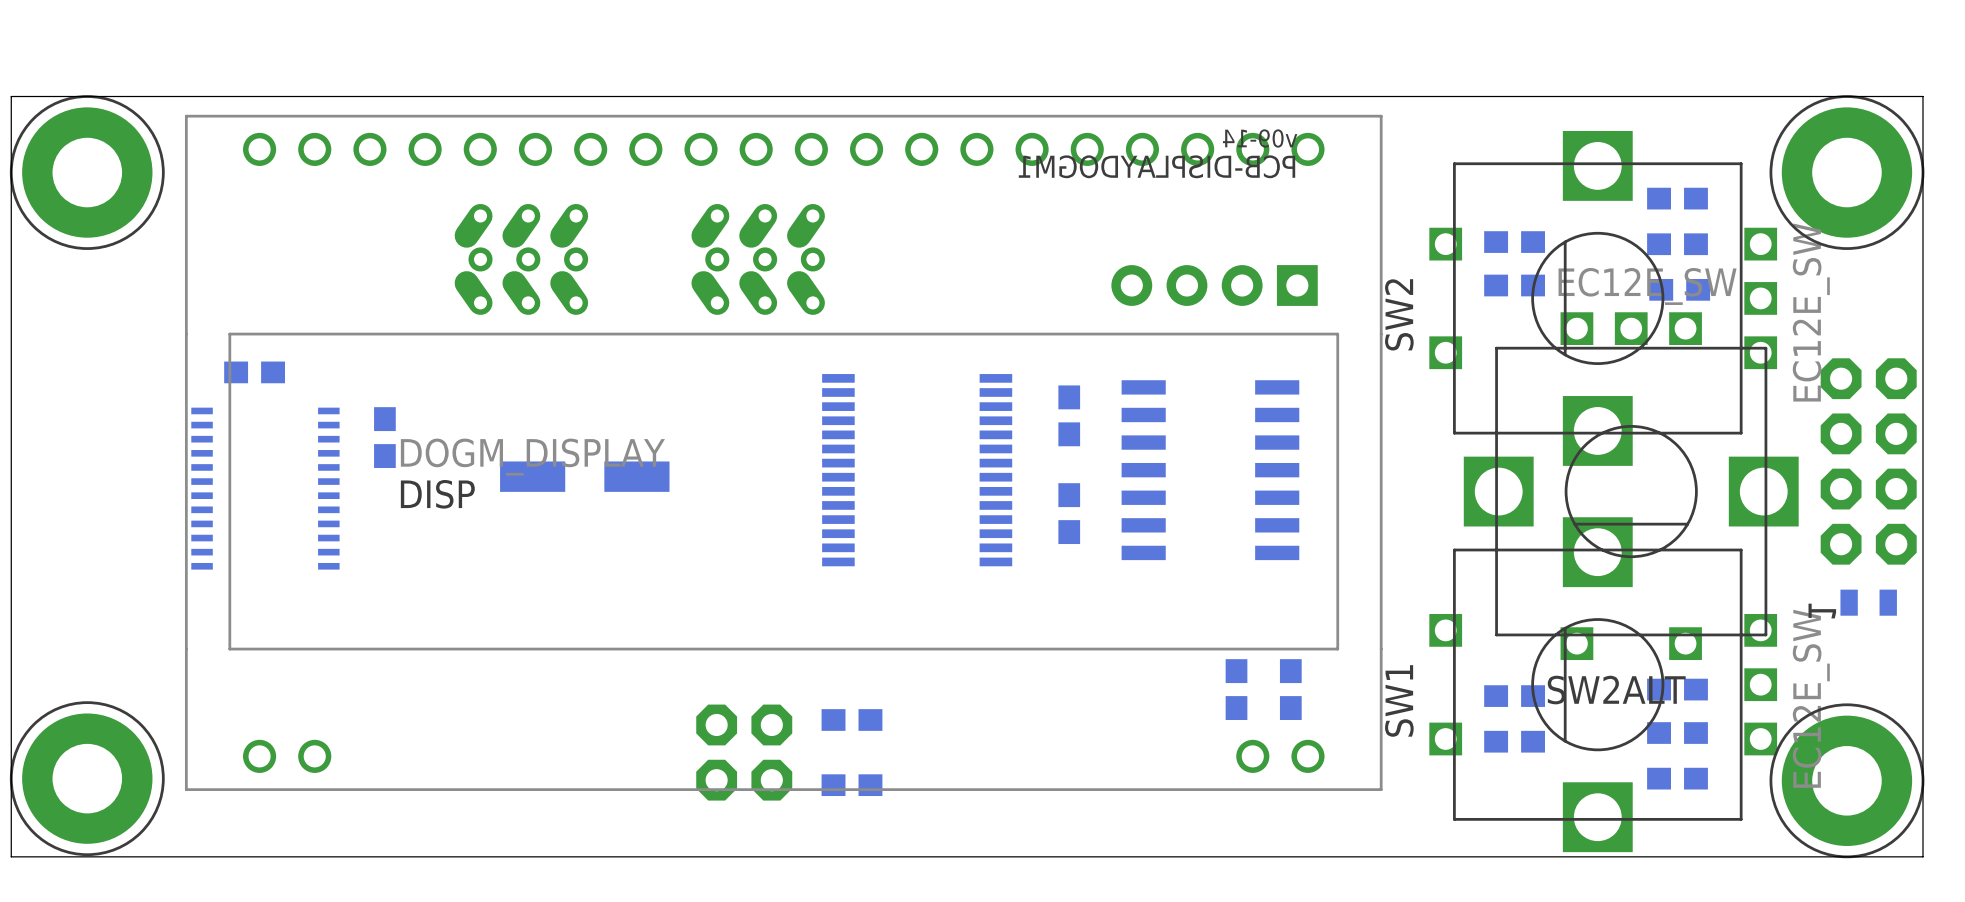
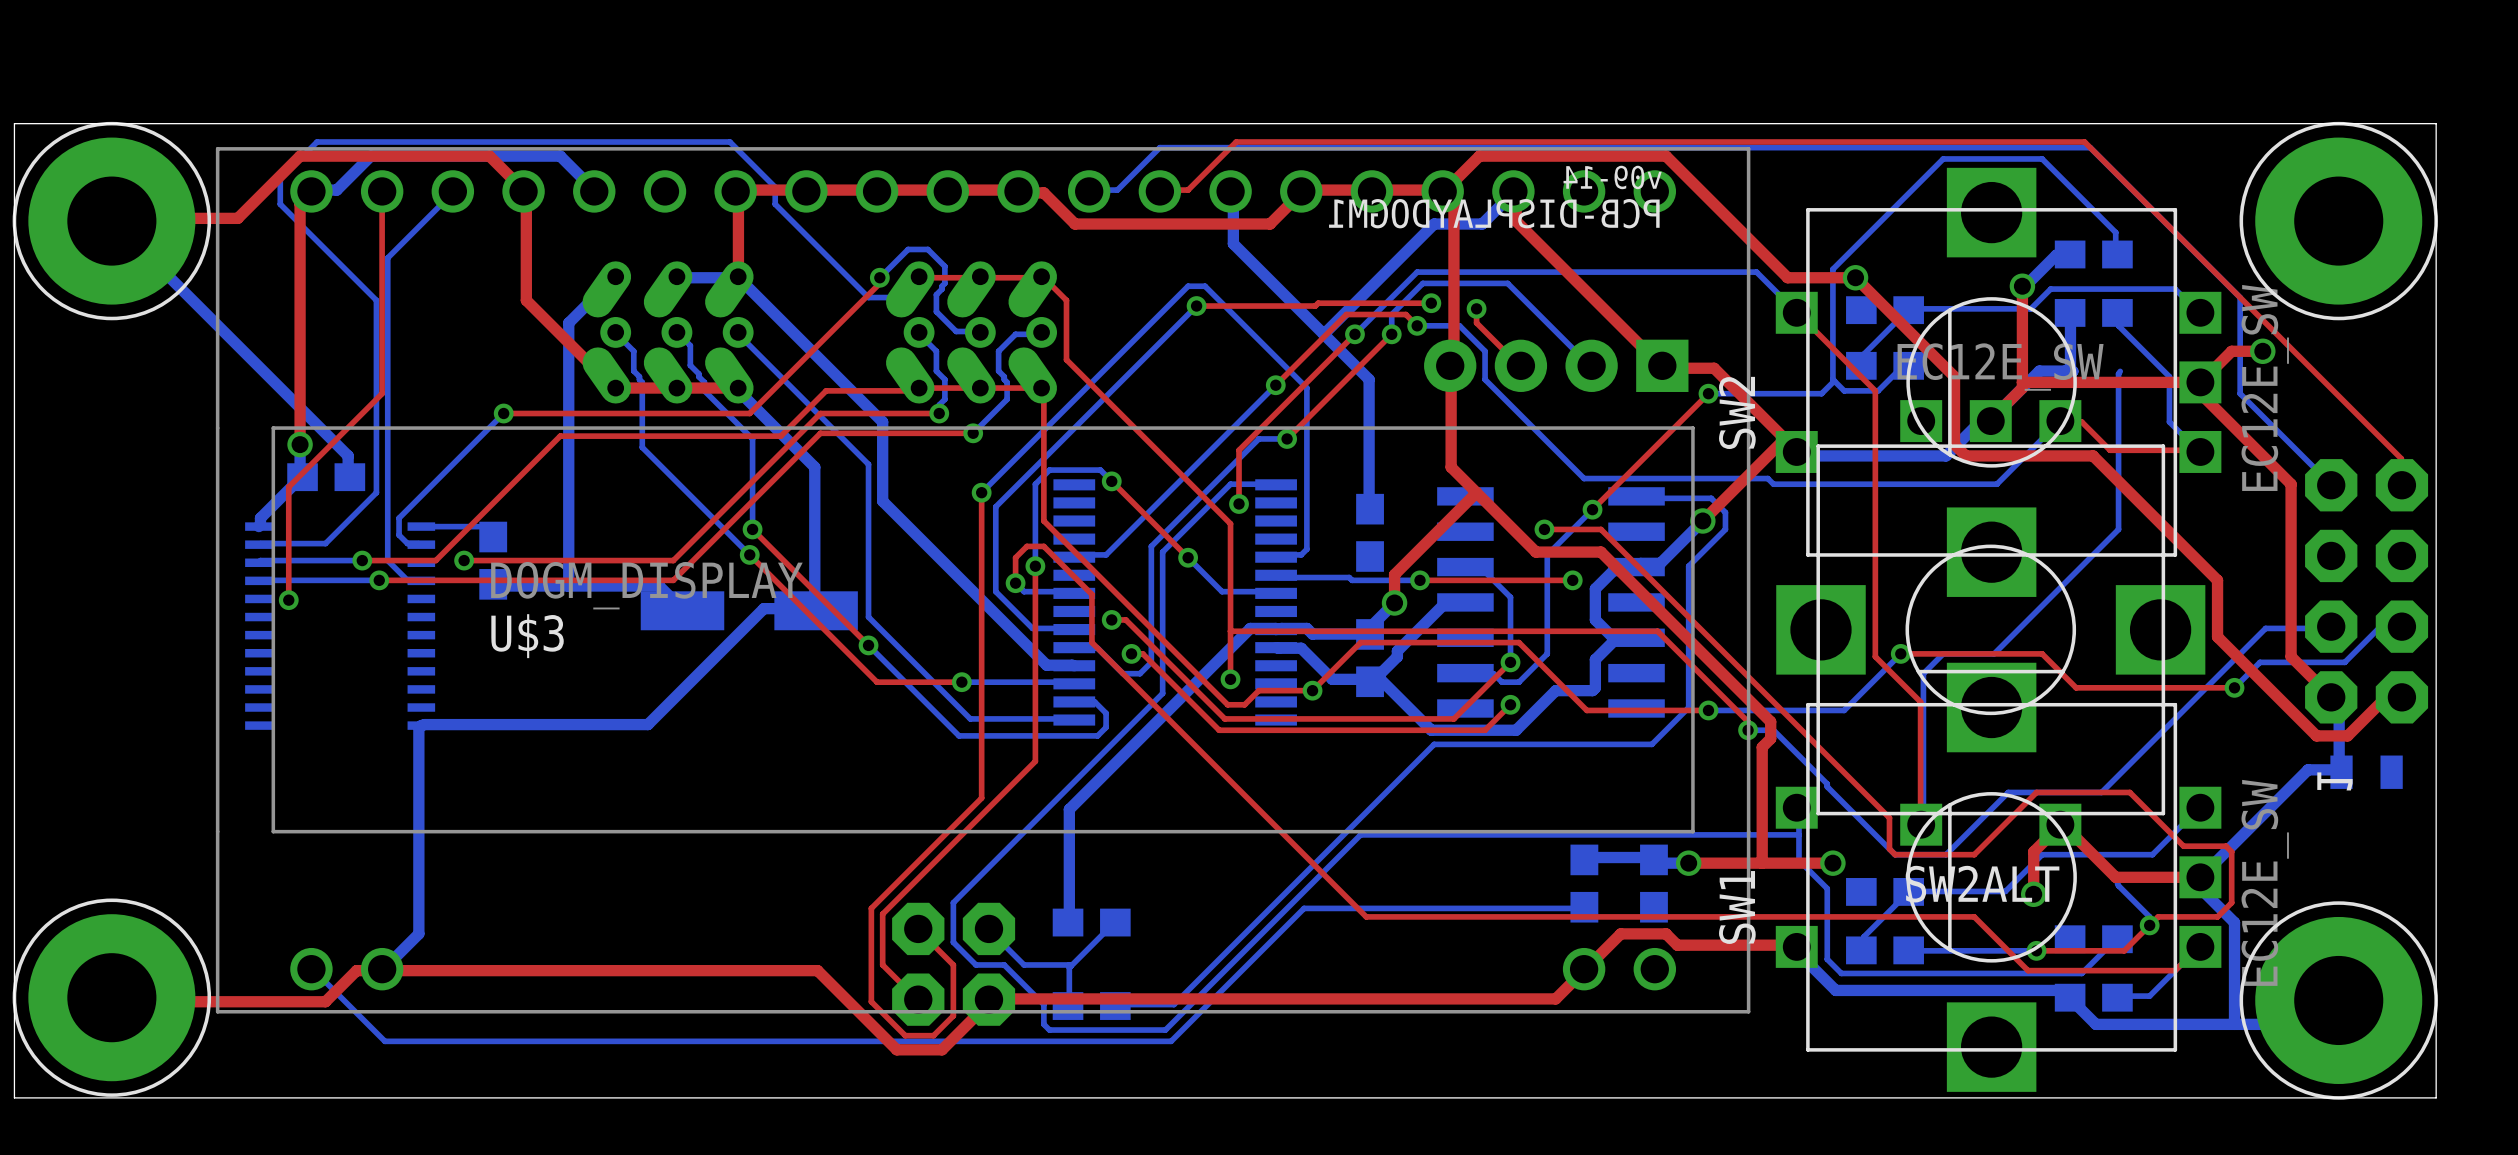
board edge: (1901, 96) (1922, 96) (1922, 856) (1901, 856) -> (2436, 123) (2436, 1097)
bottom track: none -> (311, 191) (336, 190) (370, 156) (560, 156) (594, 191)
top track: none -> (311, 191) (300, 204) (300, 444)
top track: none -> (382, 191) (382, 393) (288, 487) (288, 600)
bottom track: none -> (452, 191) (387, 257) (387, 560) (407, 580) (421, 580)
bottom track: none -> (1089, 191) (1117, 190) (1159, 147) (2090, 147) (2240, 297) (2240, 393) (2331, 485)
top track: none -> (1159, 191) (1188, 190) (1236, 142) (2084, 142) (2401, 458) (2401, 485)
bottom track: none -> (1230, 191) (1233, 192) (1233, 243) (1369, 379) (1370, 509)
top track: none -> (1442, 191) (1479, 156) (1666, 156) (1787, 277) (1855, 277) (1954, 376) (1954, 444) (1965, 455) (2093, 455) (2217, 580) (2217, 636) (2316, 735) (2347, 735) (2384, 699) (2401, 699) (2401, 697)
top track: none -> (1442, 191) (1304, 190) (1270, 224) (1074, 224) (1043, 192) (1024, 192) (1018, 190) (741, 190) (735, 191) (738, 195) (738, 276)
top track: none -> (1442, 191) (1453, 204) (1453, 362) (1450, 365) (1451, 467) (1535, 552) (1601, 552) (1770, 721) (1770, 738) (1762, 747) (1762, 863)
bottom track: none -> (1513, 191) (1482, 224) (1434, 224) (1323, 334)
top track: none -> (1513, 191) (1516, 192) (1516, 221) (1663, 368) (1714, 368) (1796, 450) (1796, 451) (1782, 441) (1702, 520)
bottom track: none -> (111, 221) (348, 455) (348, 475) (349, 477)
top track: none -> (111, 221) (113, 218) (237, 218) (300, 156) (489, 156) (526, 192) (526, 300) (611, 385) (615, 388) (738, 388)
part position: (1846, 172) -> (2338, 221)
bottom track: none -> (2070, 254) (2056, 255) (2025, 286) (2022, 286)
part: none -> (2093, 254)
bottom track: none -> (2117, 254) (2115, 252) (2115, 232) (2042, 158) (1943, 158) (1832, 269) (1832, 379) (1844, 390) (1878, 390) (1900, 368) (1906, 368) (1908, 365)
part: (1677, 198) -> none
bottom track: none -> (615, 276) (568, 323) (568, 586)
bottom track: none -> (676, 276) (738, 276) (882, 421) (882, 501) (1046, 665) (1074, 665)
bottom track: none -> (919, 276) (896, 297) (868, 297) (775, 204) (775, 187) (729, 142) (317, 142) (280, 178) (280, 204) (376, 300) (376, 492) (325, 543) (258, 544)
top track: none -> (919, 276) (1041, 276) (1066, 300) (1066, 359) (1230, 523) (1230, 679)
bottom track: none -> (879, 277) (908, 249) (927, 249) (944, 266) (944, 283) (936, 294) (936, 311) (956, 331) (980, 332)
top track: none -> (879, 277) (879, 283) (749, 413) (503, 413)
via: none -> (879, 277)
via: none -> (1855, 277)
top track: none -> (2022, 286) (2022, 388) (1990, 421)
via: none -> (2022, 286)
top track: none -> (1431, 303) (1196, 306)
via: none -> (1431, 303)
bottom track: none -> (1196, 306) (995, 506) (995, 591) (1032, 628) (1074, 629)
via: none -> (1196, 306)
top track: none -> (1476, 308) (1476, 323) (1520, 365)
via: none -> (1476, 308)
part: none -> (1885, 310)
part: (1514, 242) -> none
bottom track: none -> (1796, 312) (1756, 272) (1417, 272) (1354, 334)
top track: none -> (1796, 312) (1875, 390) (1875, 656) (1920, 701) (1921, 824)
bottom track: none -> (2070, 312) (2070, 371) (2072, 371) (2039, 371) (1990, 421) (1979, 421) (1946, 455) (1801, 455) (1796, 451)
part: none -> (2093, 312)
bottom track: none -> (2117, 312) (2118, 325) (2169, 376) (2169, 421) (2200, 451)
part: (1677, 244) -> none
bottom track: none -> (2200, 312) (2175, 289) (2050, 289) (2030, 308) (1909, 308) (1864, 354) (1864, 365) (1861, 365)
bottom track: none -> (1417, 325) (1459, 325) (1485, 351) (1485, 379) (1584, 478) (1767, 478) (1773, 484) (1996, 484) (2060, 421)
top track: none -> (1417, 325) (1405, 314) (1346, 314) (1275, 385)
via: none -> (1417, 325)
bottom track: none -> (615, 332) (633, 351) (633, 371) (642, 382) (642, 447) (749, 554)
bottom track: none -> (676, 332) (690, 345) (690, 365) (704, 382) (704, 390) (752, 438) (752, 529)
bottom track: none -> (738, 332) (868, 464) (868, 617) (970, 718) (1074, 720)
bottom track: none -> (919, 332) (936, 351) (936, 371) (944, 379) (944, 399) (939, 405) (939, 413)
bottom track: none -> (1041, 332) (1041, 334) (1015, 334) (998, 351) (998, 371) (1007, 382) (1007, 399) (973, 433)
top track: none -> (1354, 334) (1239, 450) (1239, 504)
via: none -> (1354, 334)
bottom track: none -> (1391, 334) (1391, 314) (1422, 283) (1507, 283) (1591, 365)
top track: none -> (1391, 334) (1287, 438)
via: none -> (1391, 334)
top track: none -> (2262, 351) (2231, 351) (2200, 382)
via: none -> (2262, 351)
part: none -> (1885, 365)
part: (1514, 285) -> none
bottom track: none -> (2120, 371) (2118, 373) (2118, 529) (1994, 653) (1943, 653) (1923, 673) (1923, 823) (1921, 824)
part: (1679, 289) -> none
bottom track: none -> (1834, 380) (1821, 393) (1708, 393)
top track: none -> (2022, 382) (2200, 382)
SW2 position: (1603, 298) -> (1998, 382)
top track: none -> (2200, 382) (2200, 393) (2291, 484) (2291, 656) (2331, 697)
bottom track: none -> (1275, 385) (1106, 554) (1074, 554) (1074, 557)
via: none -> (1275, 385)
bottom track: none -> (738, 388) (738, 390) (814, 467) (816, 610) (809, 608) (763, 608) (647, 724) (424, 724) (418, 727) (418, 933) (382, 969)
top track: none -> (919, 388) (916, 390) (826, 390) (780, 436) (560, 436) (435, 560) (362, 560)
top track: none -> (919, 388) (1041, 388)
top track: none -> (1041, 388) (1043, 390) (1043, 520) (1227, 704) (1244, 704) (1258, 690) (1312, 690) (1360, 642) (1519, 642) (1586, 710) (1708, 710)
top track: none -> (1708, 393) (1592, 509)
via: none -> (1708, 393)
bottom track: none -> (503, 413) (399, 518) (399, 535) (407, 543) (421, 544)
via: none -> (503, 413)
top track: none -> (939, 413) (820, 413) (673, 560) (464, 560)
via: none -> (939, 413)
top track: none -> (2060, 421) (2081, 421) (2110, 450) (2197, 450) (2200, 451)
top track: none -> (973, 433) (820, 433) (673, 580) (379, 580)
via: none -> (973, 433)
bottom track: none -> (1287, 438) (1258, 438) (1151, 546) (1151, 662) (1140, 673) (1123, 673) (1097, 648) (1074, 647)
via: none -> (1287, 438)
bottom track: none -> (300, 444) (300, 472) (302, 477) (260, 518) (258, 526)
via: none -> (300, 444)
bottom track: none -> (1111, 481) (1100, 470) (1049, 470) (1035, 484) (1035, 566)
top track: none -> (1111, 481) (1188, 557)
via: none -> (1111, 481)
bottom track: none -> (1276, 484) (1230, 484) (1162, 552) (1162, 693) (953, 902) (953, 942) (976, 964) (1004, 964) (1043, 1004) (1043, 1024) (1049, 1030) (1165, 1030) (1360, 834) (1798, 834)
bottom track: none -> (981, 492) (1188, 286) (1205, 286) (1306, 388) (1306, 549) (1301, 554) (1278, 554) (1276, 557)
top track: none -> (981, 492) (981, 798) (871, 908) (871, 1001) (905, 1035) (933, 1035) (953, 1015) (953, 964) (918, 928)
via: none -> (981, 492)
top track: none -> (1476, 492) (1394, 574) (1394, 602)
bottom track: none -> (1636, 496) (1637, 498) (1711, 498) (1725, 512) (1725, 529) (1688, 566) (1688, 707) (1651, 744) (1434, 744) (1173, 1004) (1115, 1006)
via: none -> (1239, 504)
bottom track: none -> (1592, 509) (1547, 554) (1547, 653) (1519, 682) (1502, 682) (1493, 673) (1465, 673)
via: none -> (1592, 509)
bottom track: none -> (1702, 520) (1660, 563) (1640, 563) (1634, 569) (1615, 569) (1595, 588) (1595, 619) (1612, 636) (1636, 637) (1634, 639) (1615, 639) (1595, 659) (1595, 687) (1592, 690) (1555, 690) (1516, 730) (1431, 730) (1380, 679) (1370, 681)
via: none -> (1702, 520)
bottom track: none -> (421, 526) (483, 526) (493, 537)
top track: none -> (752, 529) (868, 645)
via: none -> (752, 529)
top track: none -> (1544, 529) (1601, 529) (1889, 817) (1889, 849) (1895, 854) (1974, 854) (2036, 792) (2129, 792) (2183, 846) (2226, 846) (2231, 851) (2231, 902) (2217, 916) (2158, 916) (2124, 950) (2036, 950)
via: none -> (1544, 529)
top track: none -> (749, 554) (877, 682) (961, 682)
via: none -> (749, 554)
bottom track: none -> (1188, 557) (1222, 591) (1275, 591) (1276, 593)
via: none -> (1188, 557)
bottom track: none -> (362, 560) (260, 560) (258, 562)
via: none -> (362, 560)
via: none -> (464, 560)
top track: none -> (1035, 566) (1035, 761) (882, 914) (882, 964) (918, 999)
via: none -> (1035, 566)
bottom track: none -> (1465, 567) (1468, 569) (1482, 569) (1510, 597) (1510, 662)
bottom track: none -> (1276, 575) (1278, 577) (1349, 577) (1352, 580) (1420, 580)
bottom track: none -> (379, 580) (258, 580)
via: none -> (379, 580)
DISP position: (783, 452) -> (983, 580)
top track: none -> (1420, 580) (1572, 580)
via: none -> (1420, 580)
via: none -> (1572, 580)
bottom track: none -> (1015, 583) (1024, 591) (1072, 591) (1074, 593)
top track: none -> (1015, 583) (1015, 557) (1026, 546) (1043, 546) (1091, 594) (1091, 642) (1366, 916) (1974, 916) (2028, 970) (2175, 970) (2200, 946)
via: none -> (1015, 583)
bottom track: none -> (493, 584) (495, 586) (659, 586) (682, 610)
part position: (1868, 461) -> (2366, 591)
via: none -> (288, 600)
bottom track: none -> (1394, 602) (1369, 628) (1370, 634) (1312, 634) (1306, 628) (1250, 628) (1069, 809) (1068, 922)
via: none -> (1394, 602)
bottom track: none -> (1465, 602) (1445, 602) (1397, 651) (1397, 656) (1370, 681)
top track: none -> (1111, 619) (1125, 619) (1224, 718) (1453, 718) (1510, 662)
via: none -> (1111, 619)
SW2ALT position: (1631, 486) -> (1990, 622)
bottom track: none -> (2331, 626) (2330, 628) (2265, 628) (2101, 792) (2008, 792) (1946, 854) (1895, 854) (1773, 730) (1748, 730)
bottom track: none -> (2401, 626) (2401, 628) (2378, 628) (2344, 662) (2259, 662) (2234, 687)
top track: none -> (1230, 631) (1657, 631) (1748, 721) (1748, 730)
DISP name: DISP (437, 494) -> U$3 (527, 636)
bottom track: none -> (868, 645) (959, 735) (1097, 735) (1106, 727) (1106, 713) (1094, 701) (1074, 701)
via: none -> (868, 645)
bottom track: none -> (1276, 647) (1301, 648) (1332, 679) (1369, 679) (1370, 681)
top track: none -> (1131, 653) (1142, 653) (1219, 730) (1485, 730) (1510, 704)
via: none -> (1131, 653)
bottom track: none -> (1900, 653) (1844, 710) (1708, 710)
top track: none -> (1900, 653) (2042, 653) (2076, 687) (2234, 687)
via: none -> (1900, 653)
via: none -> (1510, 662)
via: none -> (1230, 679)
bottom track: none -> (961, 682) (1072, 682) (1074, 683)
via: none -> (961, 682)
via: none -> (2234, 687)
via: none -> (1312, 690)
bottom track: none -> (2331, 697) (2339, 704) (2339, 769) (2341, 772) (2333, 769) (2308, 769) (2200, 877)
via: none -> (1510, 704)
via: none -> (1708, 710)
via: none -> (1748, 730)
part position: (1868, 602) -> (2366, 772)
bottom track: none -> (1796, 807) (1798, 809) (1798, 860) (1827, 888) (1827, 959) (1841, 973) (2081, 973) (2117, 939)
bottom track: none -> (2200, 807) (2152, 854) (2042, 854) (2005, 891) (1909, 891) (1864, 936) (1864, 948) (1861, 950)
bottom track: none -> (1584, 859) (1586, 857) (1651, 857) (1657, 863) (1688, 863)
top track: none -> (1688, 863) (1832, 863)
via: none -> (1688, 863)
via: none -> (1832, 863)
SW1 position: (1603, 684) -> (1998, 877)
bottom track: none -> (2200, 877) (2203, 880) (2203, 891) (2234, 922) (2234, 1024)
top track: none -> (2200, 877) (2115, 877) (2064, 826) (2060, 824) (2033, 851) (2033, 894)
bottom track: none -> (2117, 883) (2149, 916) (2149, 925)
part: (1677, 689) -> none
part: none -> (1885, 891)
part: (1514, 696) -> none
via: none -> (2033, 894)
bottom track: none -> (1584, 907) (1304, 908) (1171, 1041) (384, 1041) (311, 969)
bottom track: none -> (1115, 922) (1069, 967) (1068, 1006)
via: none -> (2149, 925)
bottom track: none -> (988, 928) (1024, 964) (1070, 966)
part: none -> (2093, 939)
part: (1677, 733) -> none
bottom track: none -> (1796, 946) (1798, 948) (1798, 953) (1835, 990) (2059, 990) (2064, 996) (2070, 997) (2095, 1024) (2313, 1024) (2338, 1000)
top track: none -> (1796, 946) (1796, 945) (1677, 945) (1666, 933) (1620, 933) (1555, 998) (990, 998) (987, 1004) (942, 1049) (896, 1049) (817, 970) (382, 969) (356, 970) (325, 1001) (116, 1001) (111, 997)
bottom track: none -> (2200, 946) (2149, 996) (2118, 996) (2117, 997)
part: none -> (1885, 950)
bottom track: none -> (1908, 950) (2036, 950)
part: (1514, 741) -> none
via: none -> (2036, 950)
part: none -> (2093, 997)
part: (1677, 778) -> none
part position: (1846, 780) -> (2338, 1000)

